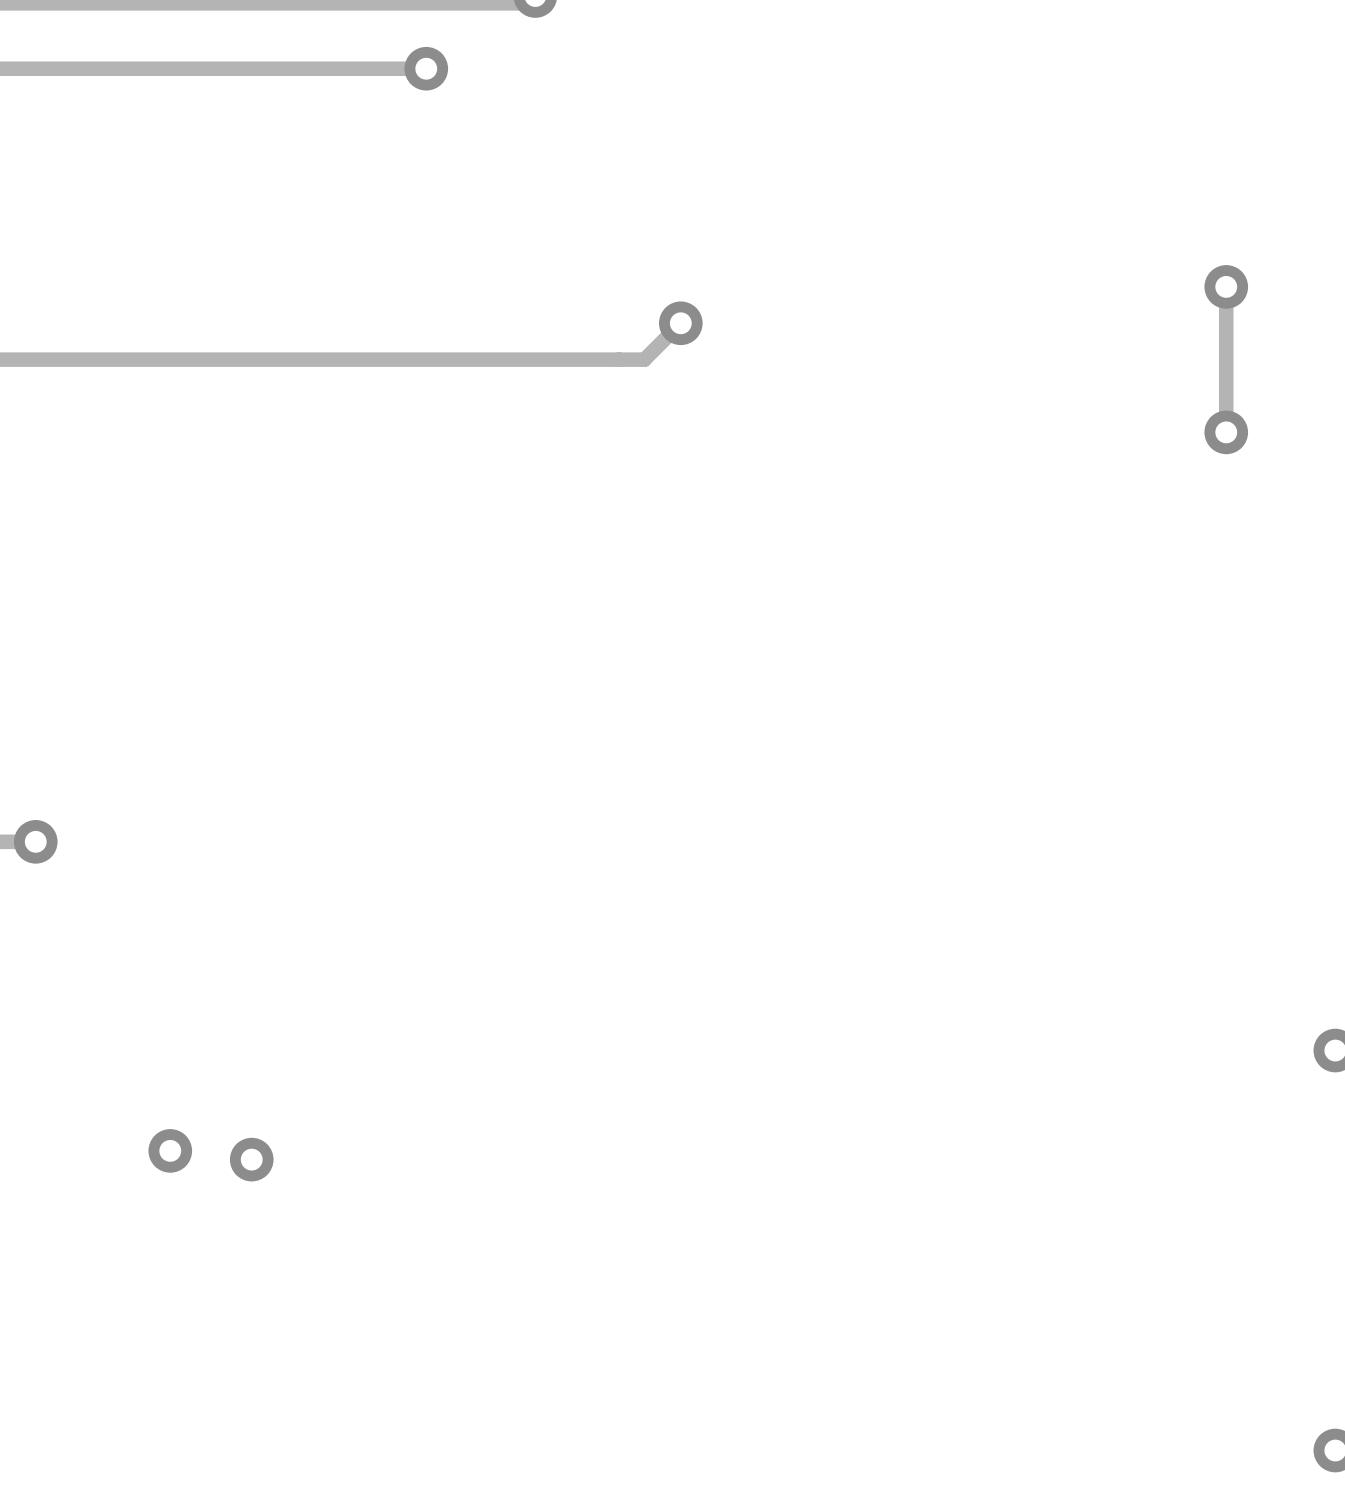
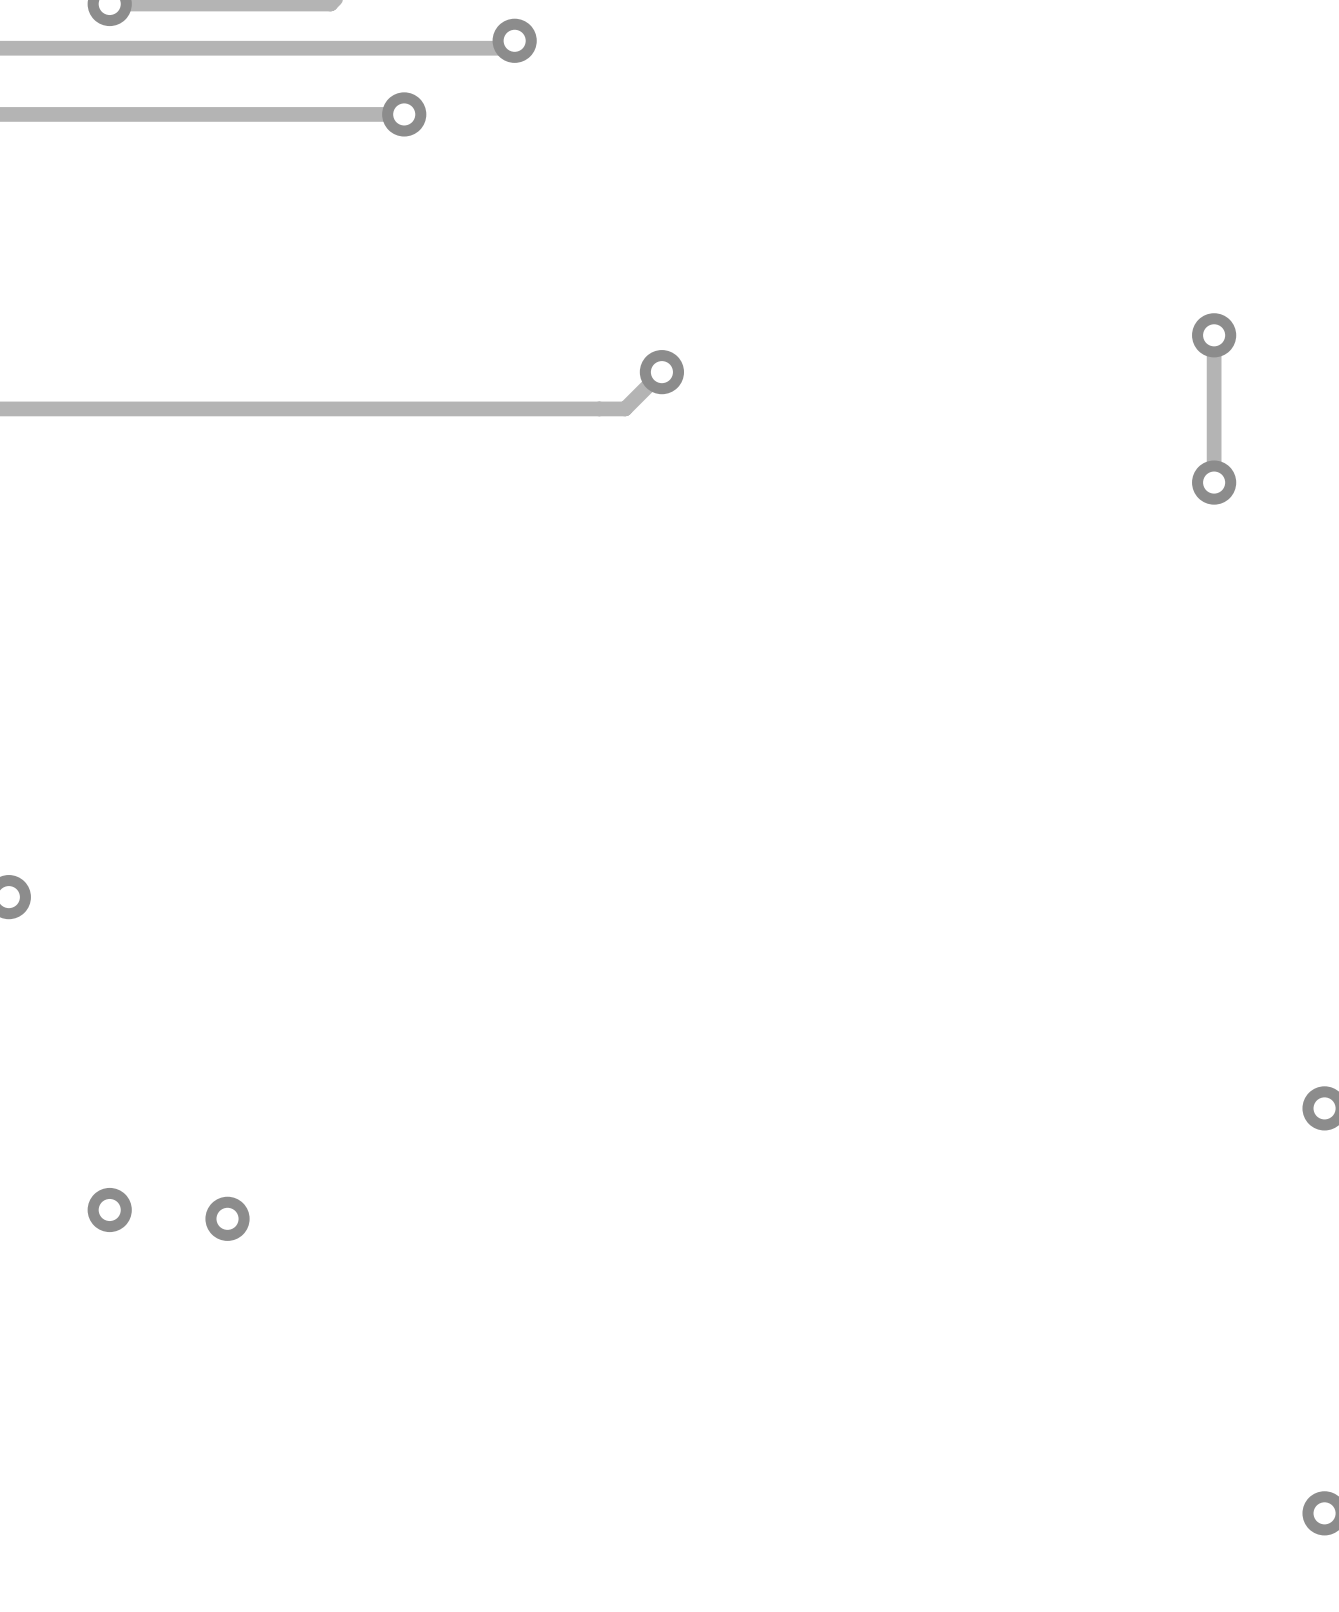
via position: (170, 1150) -> (109, 1210)

